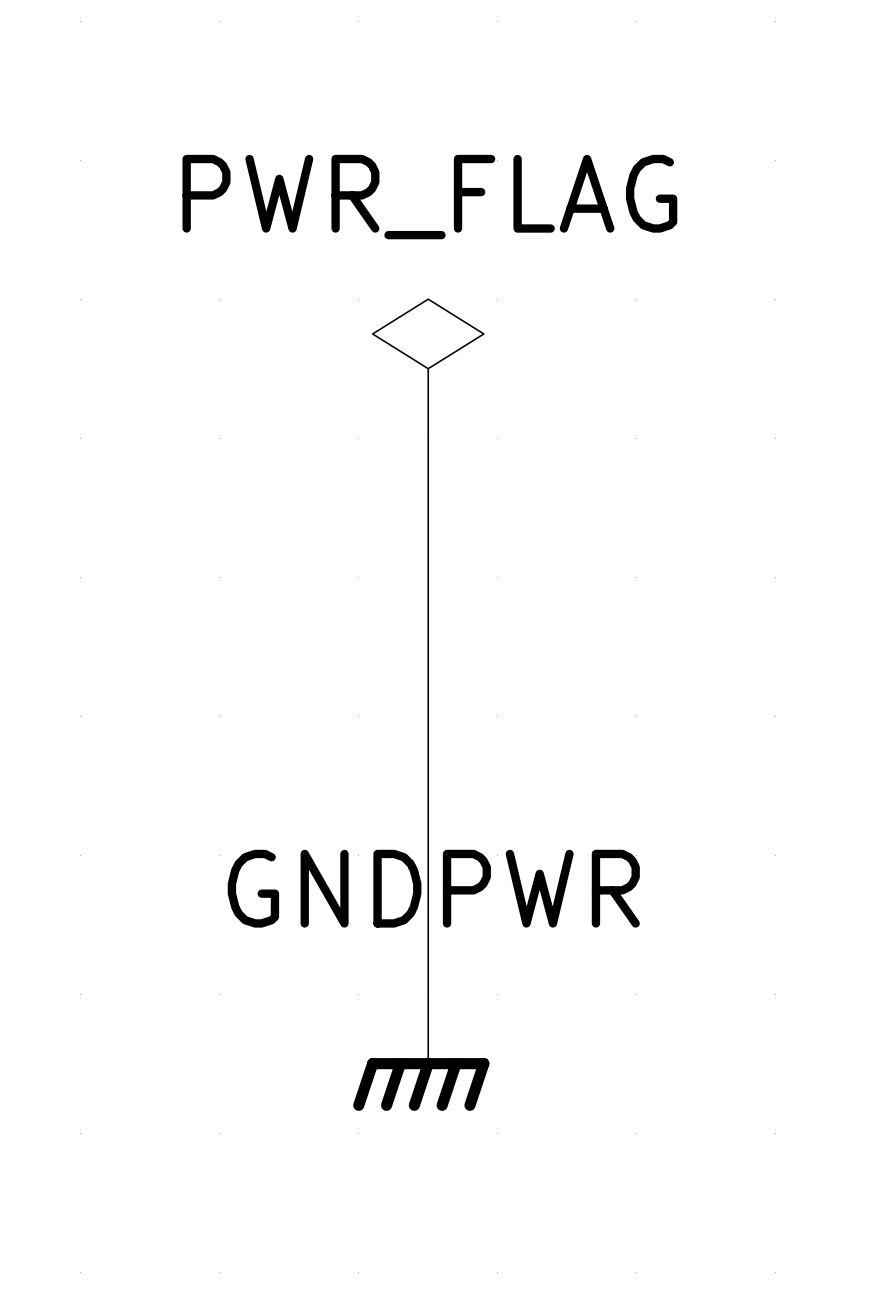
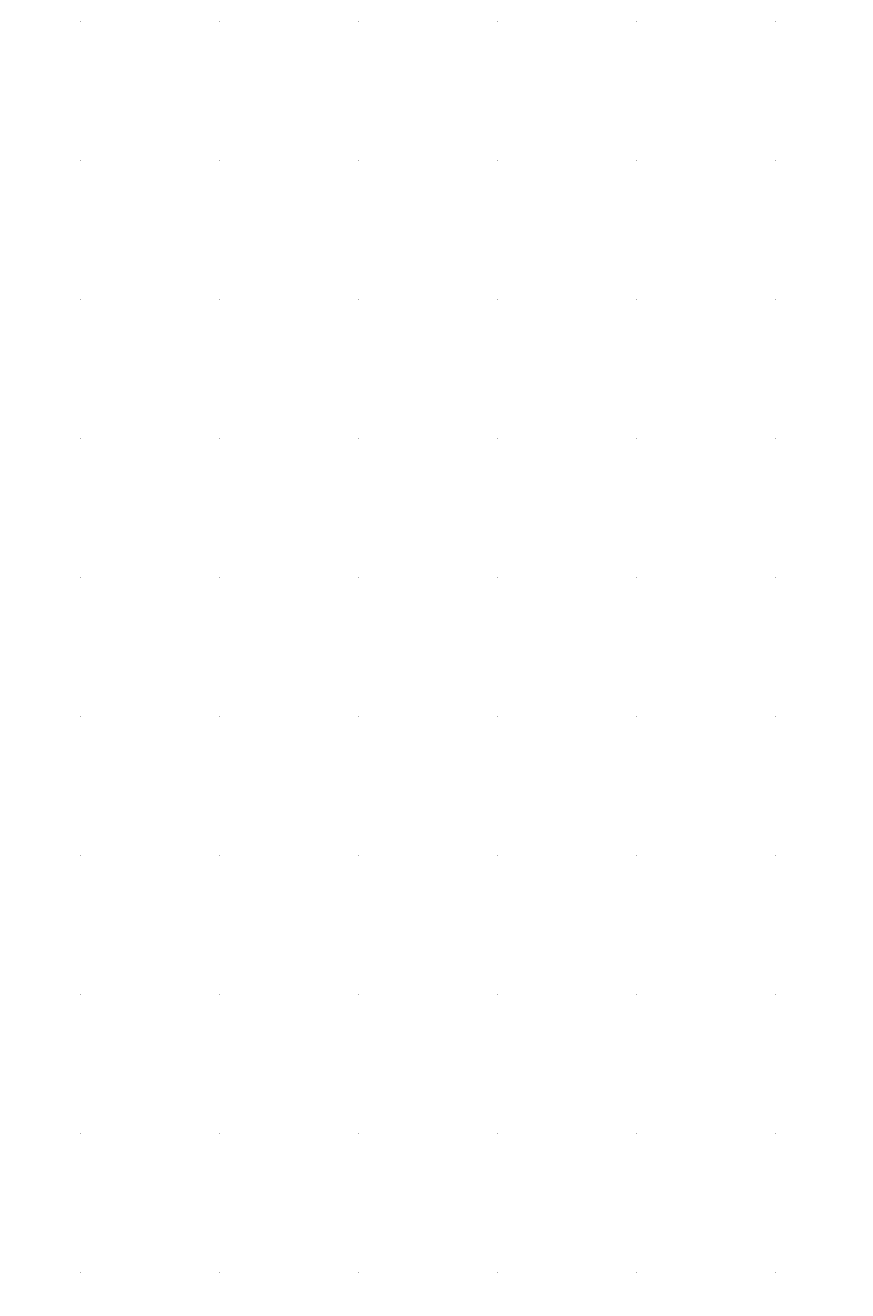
power symbol: PWR_FLAG (428, 368) -> none
wire: (428, 438) (428, 994) -> none
power symbol: GNDPWR (421, 1052) -> none

